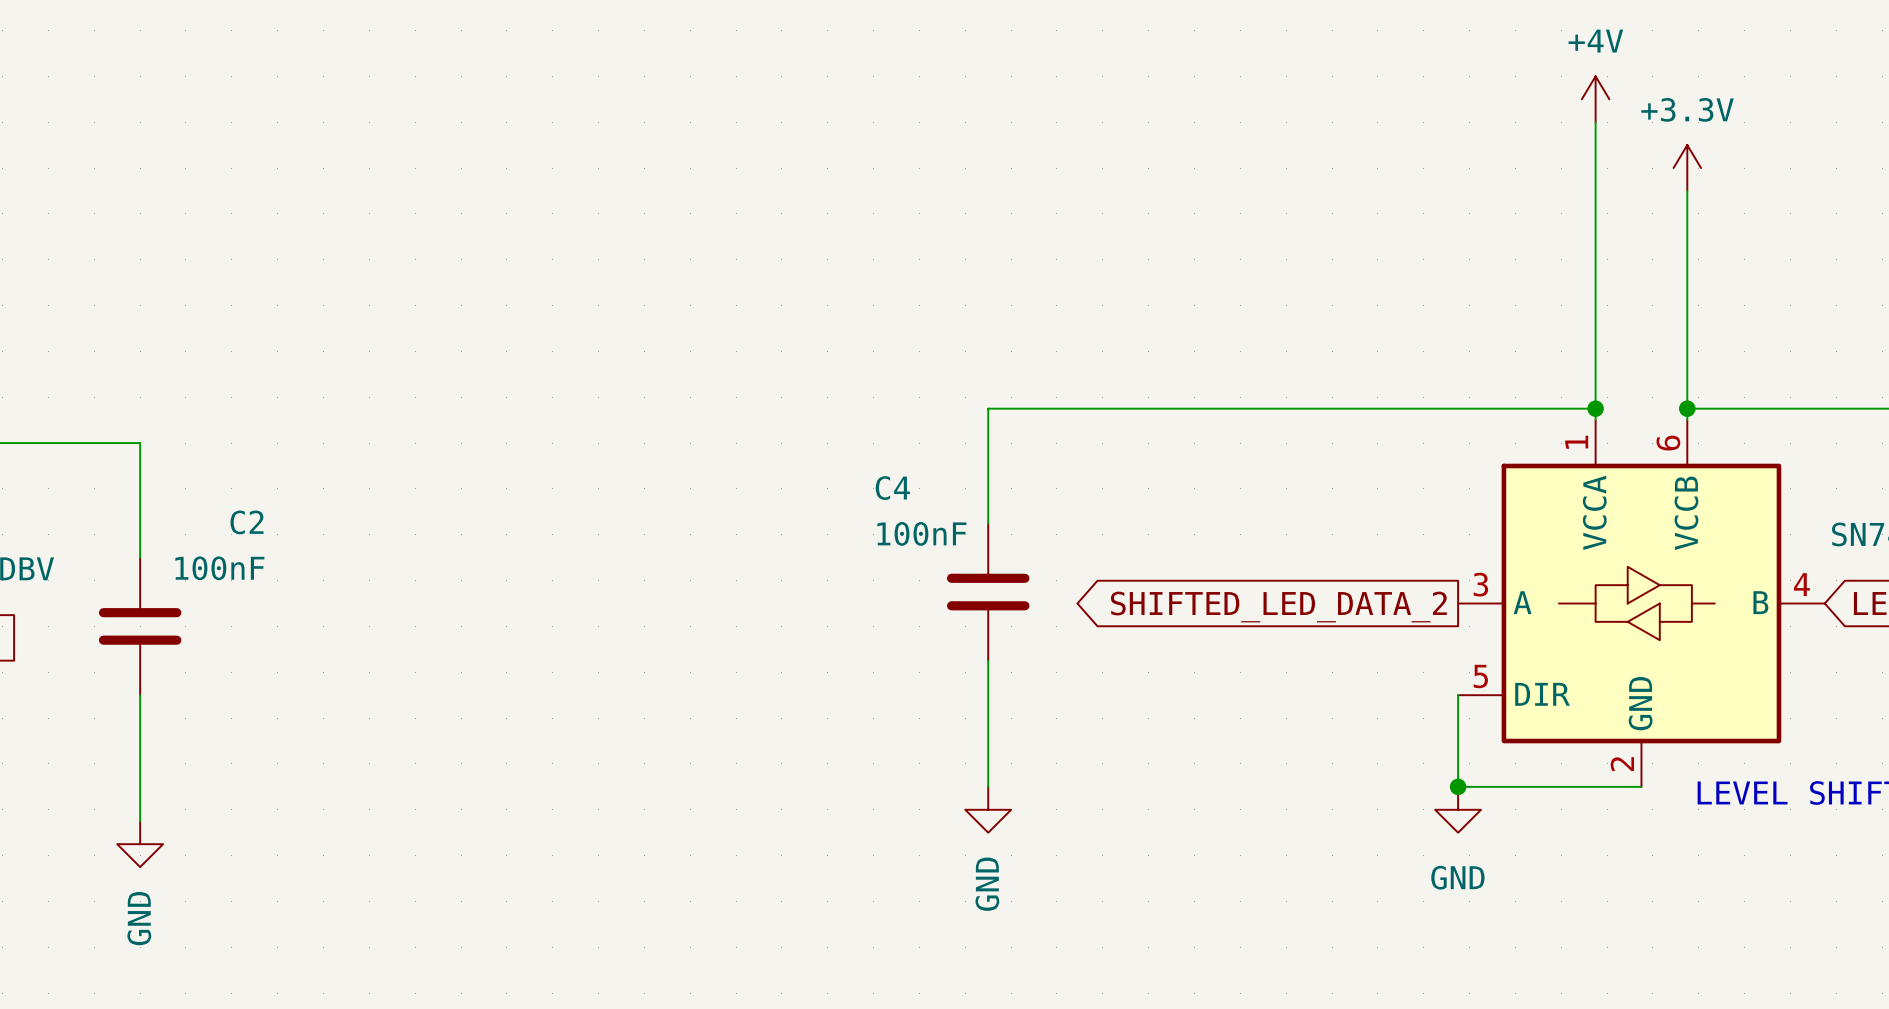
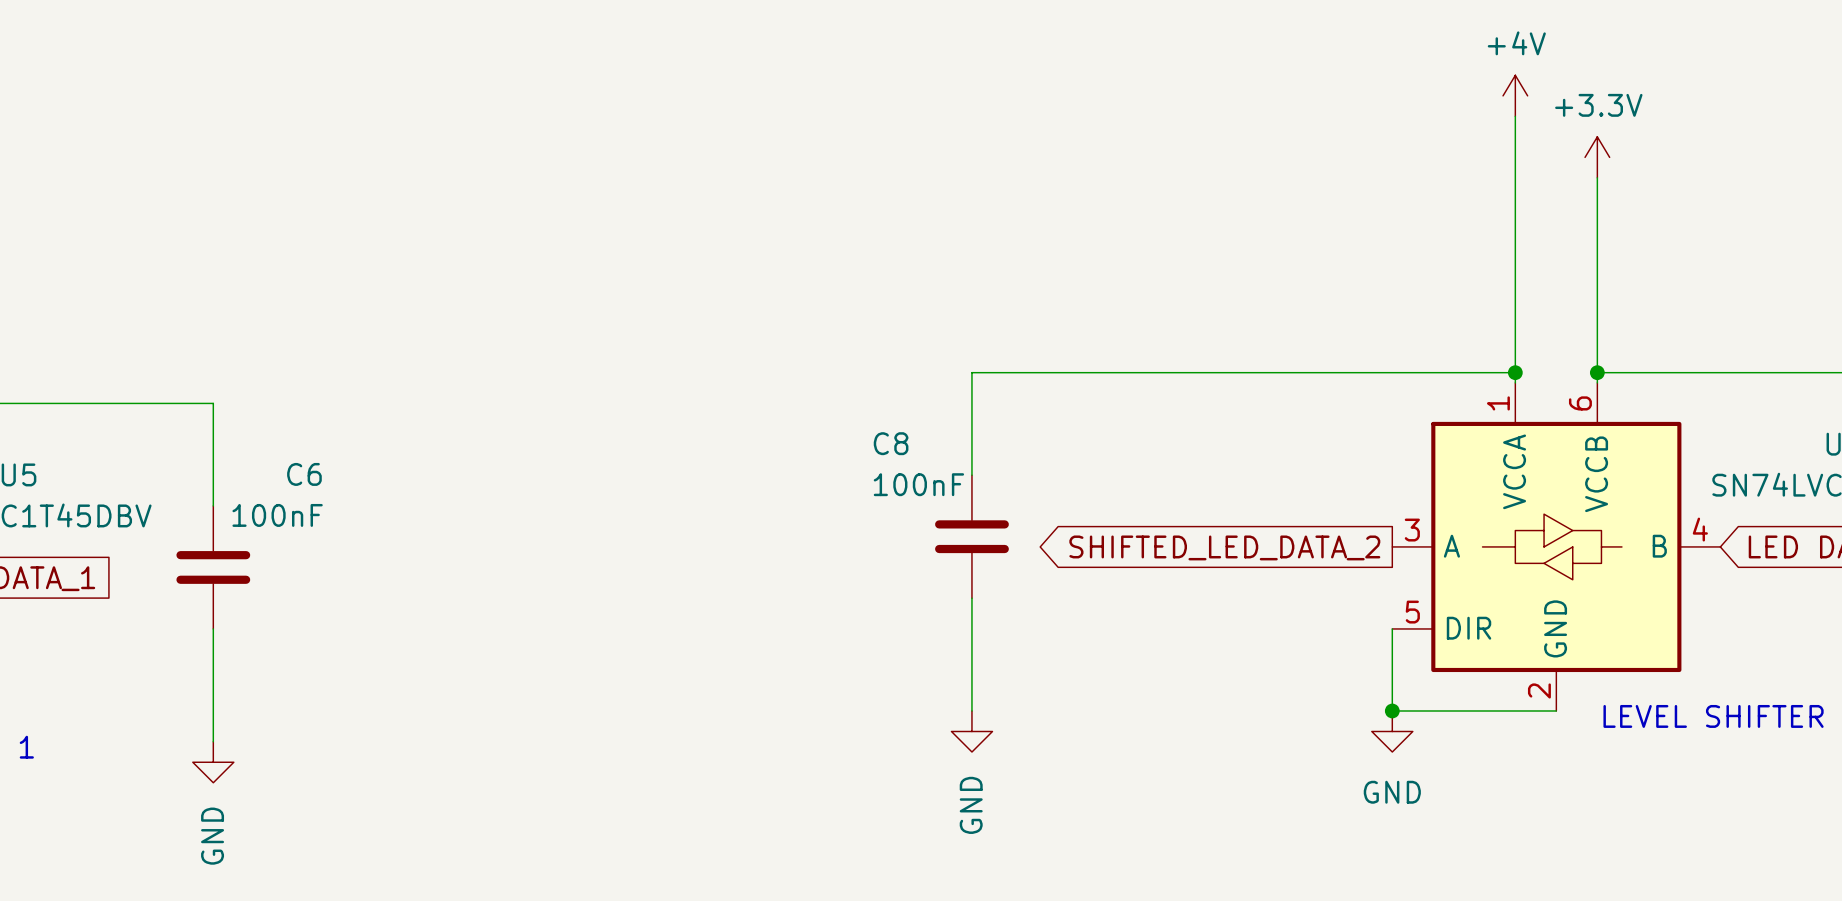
C4 name: C4 (892, 488) -> C8 (891, 443)
C2 name: C2 (247, 522) -> C6 (304, 474)

